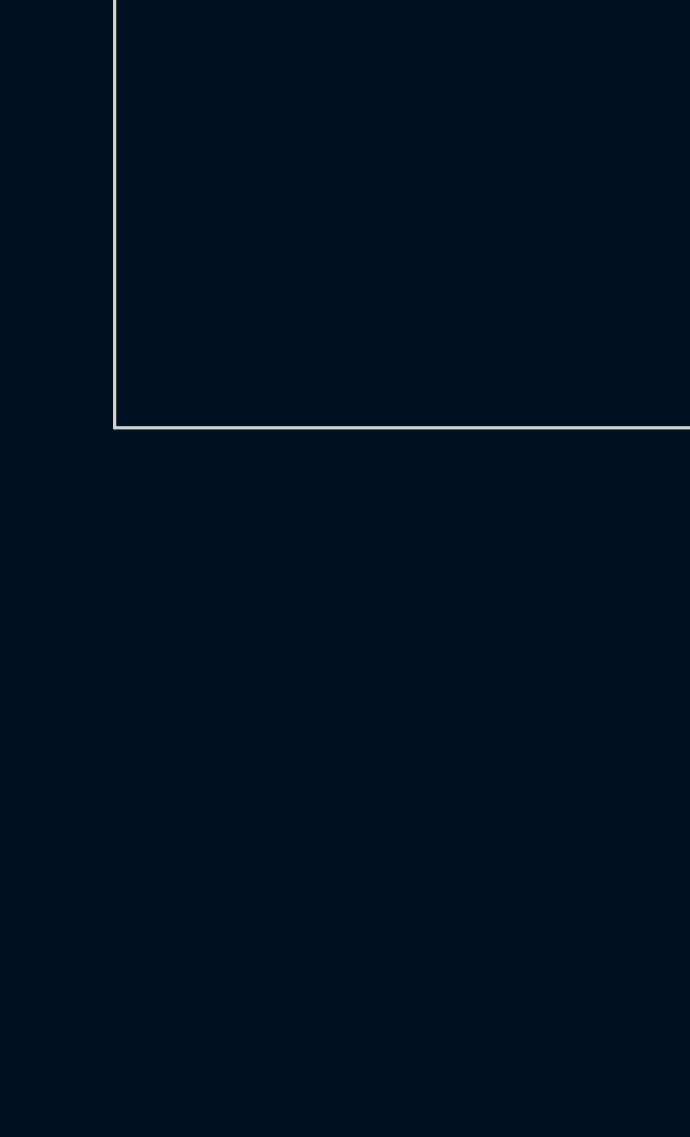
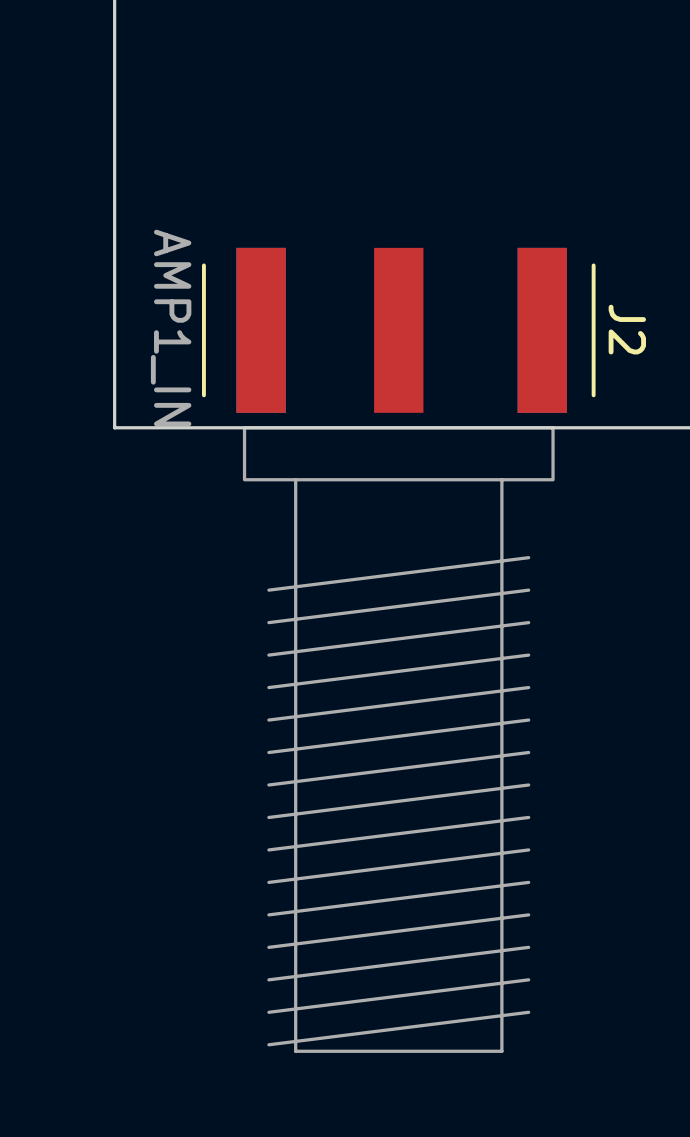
J2: none -> AMP1_IN (398, 650)

